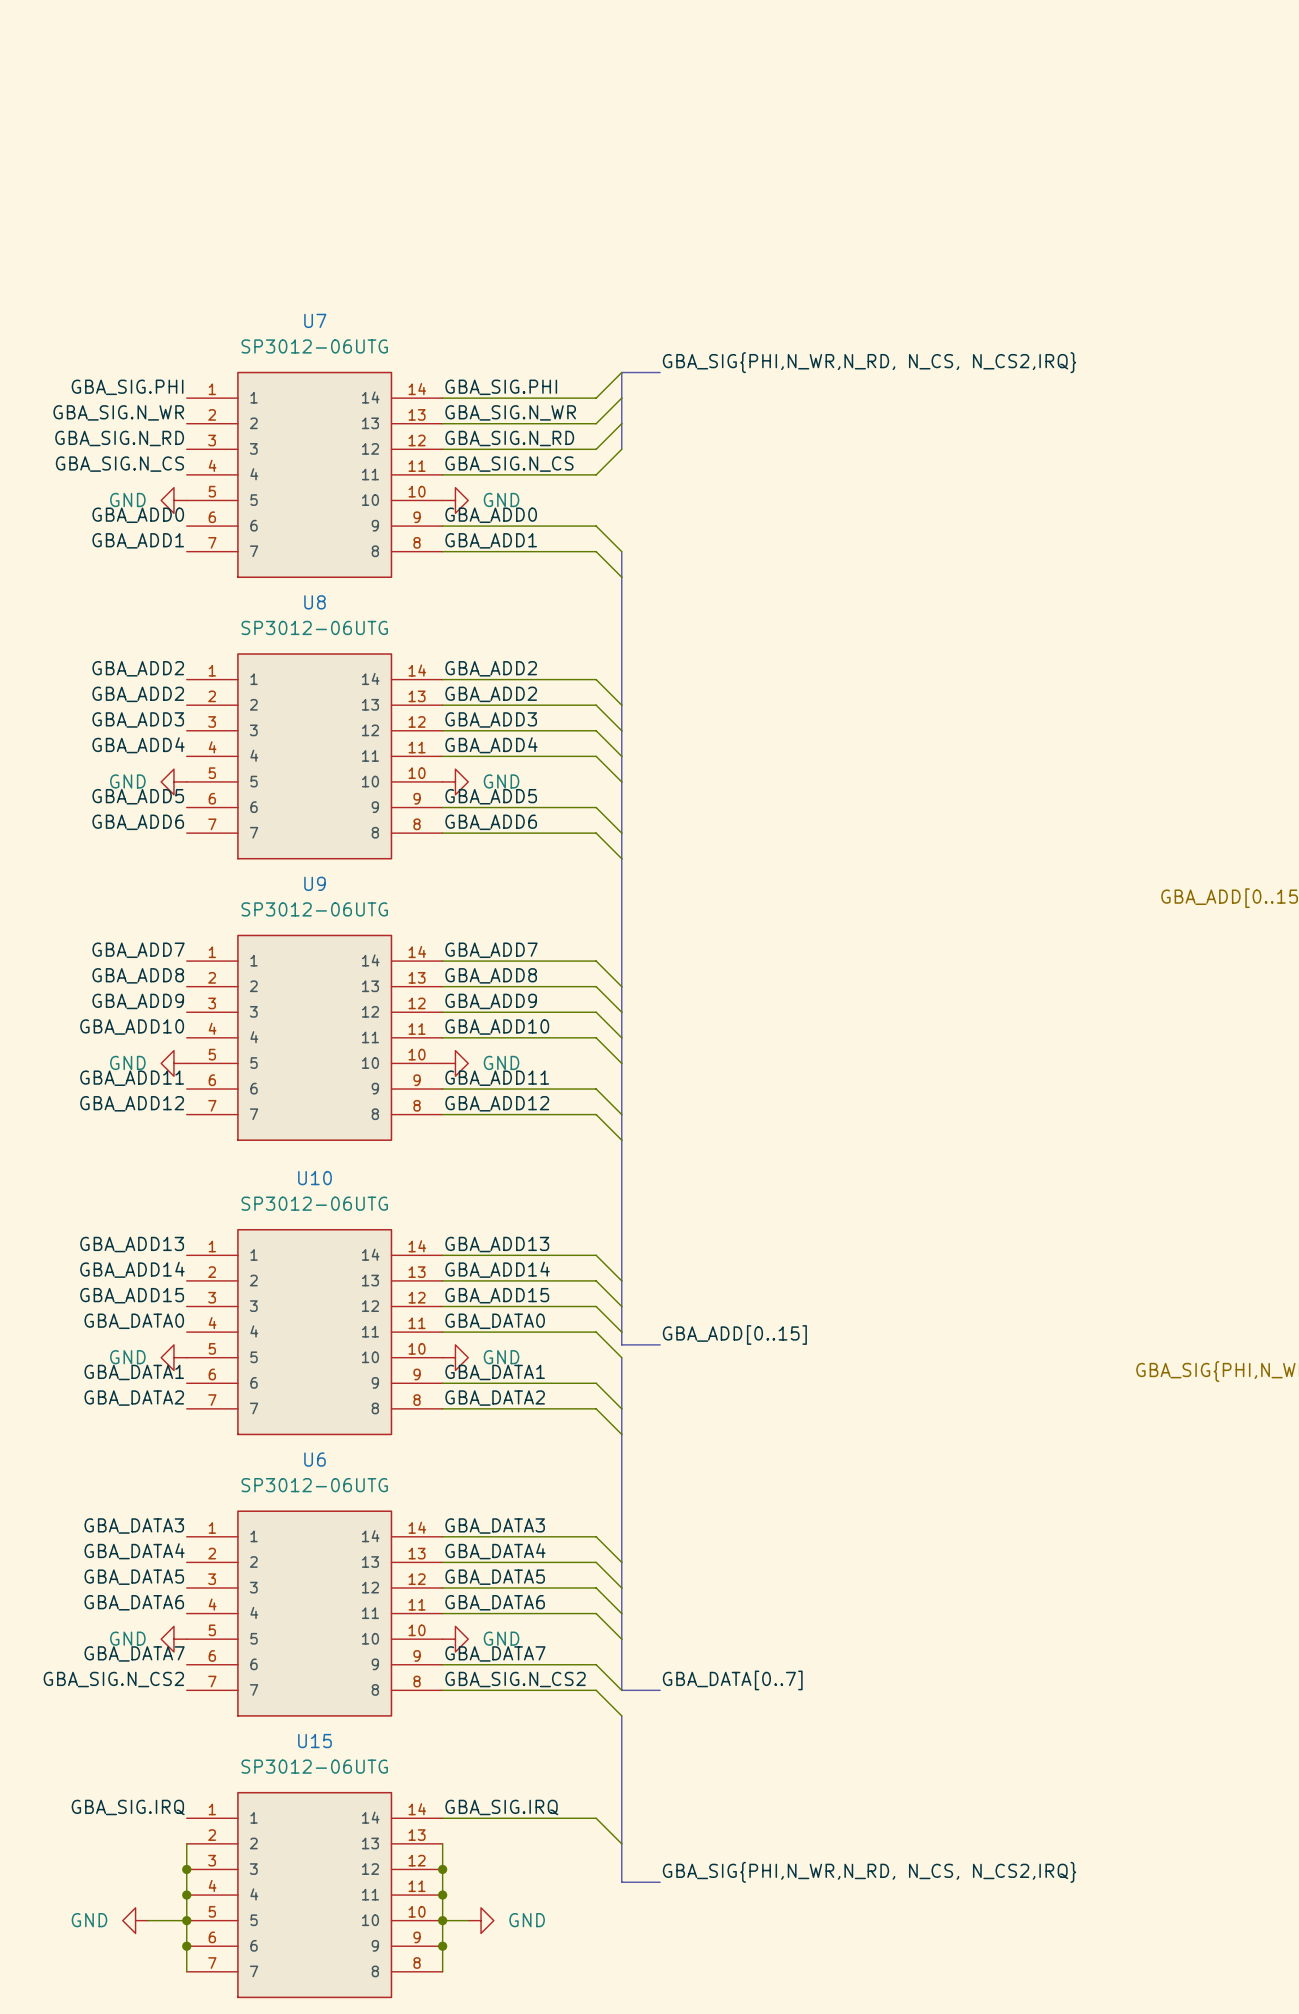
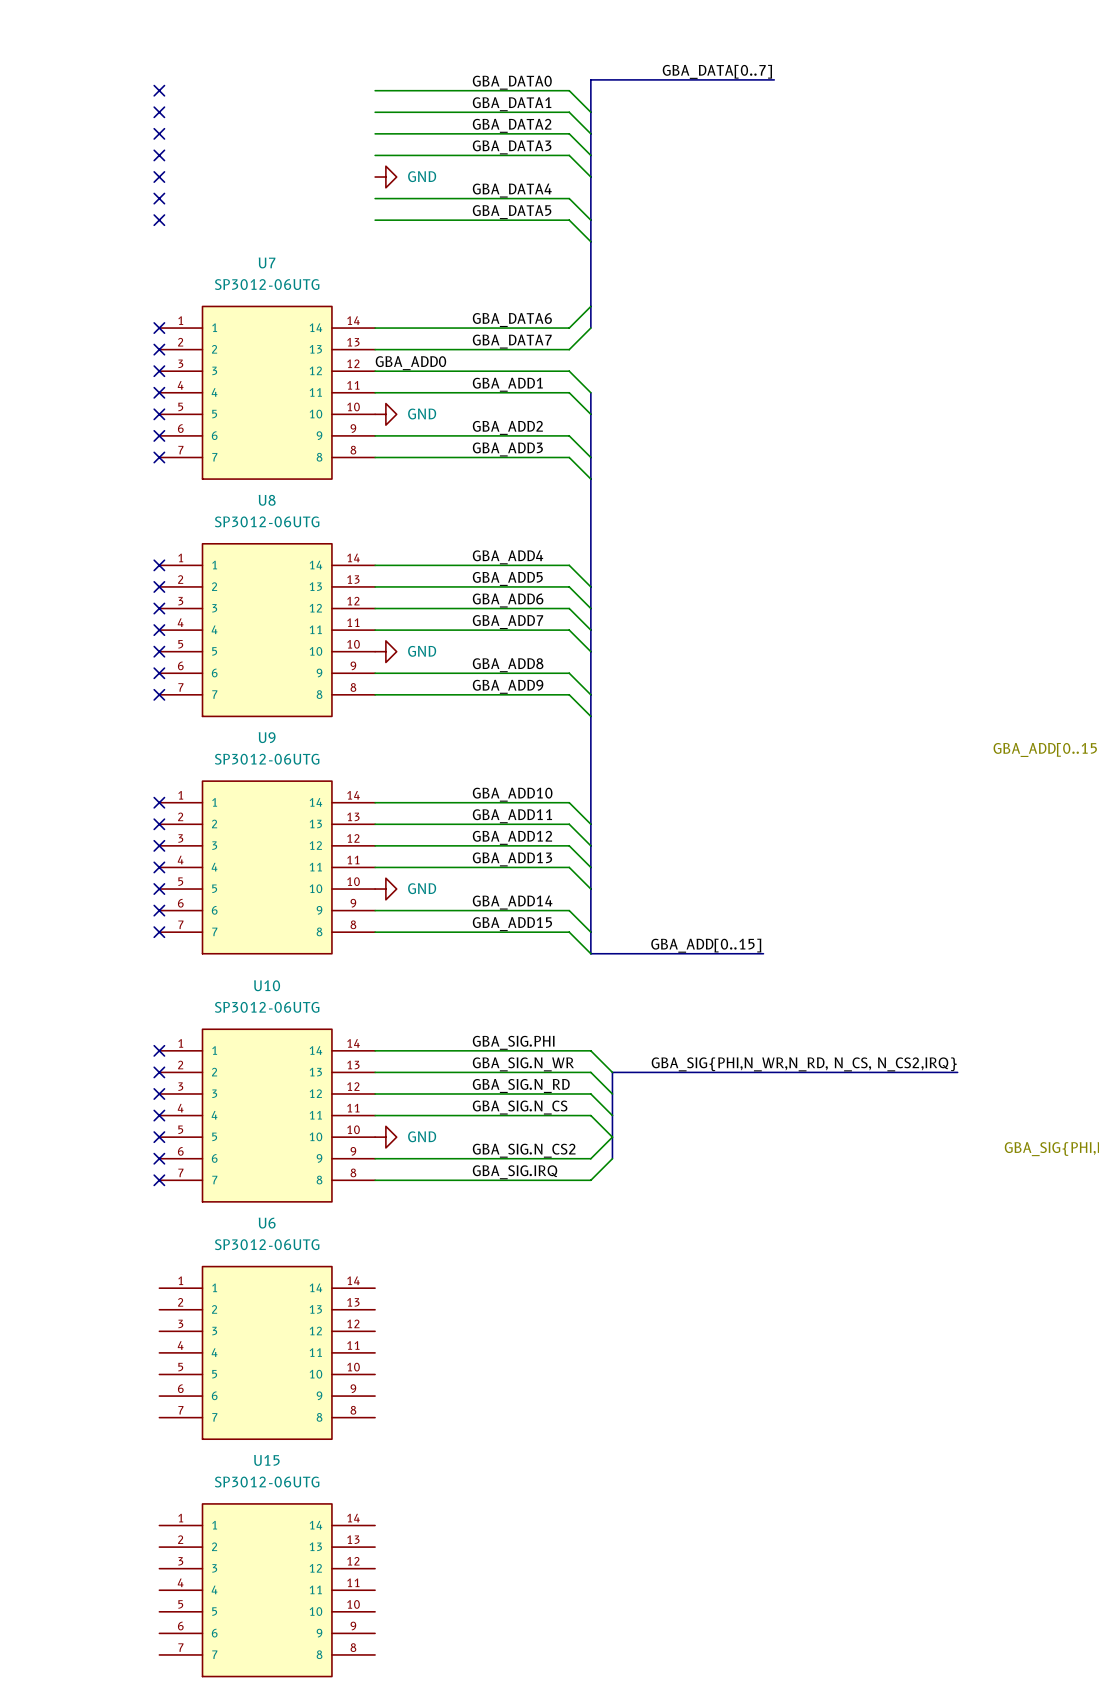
label: none -> GBA_DATA[0..7] (717, 71)
bus: none -> (774, 79) (590, 79) (590, 328)
label: none -> GBA_DATA0 (512, 82)
no-connect mark: none -> (159, 90)
wire: none -> (375, 90) (569, 90) (590, 112)
label: none -> GBA_DATA1 (512, 104)
no-connect mark: none -> (159, 112)
wire: none -> (375, 112) (569, 112) (590, 133)
label: none -> GBA_DATA2 (512, 125)
no-connect mark: none -> (159, 133)
wire: none -> (375, 133) (569, 133) (590, 155)
label: none -> GBA_DATA3 (512, 147)
no-connect mark: none -> (159, 155)
wire: none -> (375, 155) (569, 155) (590, 177)
no-connect mark: none -> (159, 177)
power symbol: none -> GND (385, 177)
label: none -> GBA_DATA4 (512, 190)
no-connect mark: none -> (159, 198)
wire: none -> (375, 198) (569, 198) (590, 220)
label: none -> GBA_DATA5 (512, 212)
no-connect mark: none -> (159, 220)
wire: none -> (375, 220) (569, 220) (590, 241)
label: GBA_SIG{PHI,N_WR,N_RD, N_CS, N_CS2,IRQ} (869, 362) -> none
wire: (621, 372) (596, 398) -> (590, 306) (569, 328) (504, 328)
bus: (660, 372) (621, 372) (621, 449) -> none
label: GBA_SIG.PHI (127, 387) -> none
label: GBA_SIG.PHI (501, 387) -> none
label: none -> GBA_DATA6 (512, 320)
no-connect mark: none -> (159, 328)
wire: (621, 398) (596, 423) -> (590, 328) (569, 349) (504, 349)
label: GBA_SIG.N_WR (118, 412) -> none
label: GBA_SIG.N_WR (510, 412) -> none
label: none -> GBA_DATA7 (512, 341)
no-connect mark: none -> (159, 349)
wire: (621, 423) (596, 449) -> (590, 392) (569, 371) (504, 371)
label: GBA_SIG.N_RD (119, 438) -> none
label: GBA_SIG.N_RD (509, 438) -> GBA_ADD0 (410, 363)
no-connect mark: none -> (159, 371)
wire: (621, 449) (596, 474) -> (590, 414) (569, 392) (504, 392)
label: GBA_SIG.N_CS (119, 464) -> none
label: GBA_SIG.N_CS (509, 464) -> none
no-connect mark: none -> (159, 392)
bus: none -> (590, 392) (590, 953) (763, 953)
power symbol: GND (173, 500) -> none
no-connect mark: none -> (159, 414)
label: GBA_ADD0 (138, 515) -> none
label: GBA_ADD0 (491, 515) -> none
label: none -> GBA_ADD2 (507, 427)
no-connect mark: none -> (159, 435)
wire: (596, 526) (621, 551) -> (504, 435) (569, 435) (590, 457)
label: GBA_ADD1 (138, 540) -> none
label position: GBA_ADD1 (491, 540) -> GBA_ADD1 (507, 384)
label: none -> GBA_ADD3 (507, 449)
no-connect mark: none -> (159, 457)
wire: (596, 551) (621, 577) -> (504, 457) (569, 457) (590, 479)
bus: (621, 551) (621, 1344) (660, 1344) -> none
label: GBA_ADD2 (138, 668) -> none
label: GBA_ADD2 (491, 668) -> none
no-connect mark: none -> (159, 565)
wire: (596, 679) (621, 705) -> (504, 565) (569, 565) (590, 586)
label: GBA_ADD2 (138, 694) -> none
label: GBA_ADD2 (491, 694) -> none
no-connect mark: none -> (159, 586)
wire: (596, 705) (621, 730) -> (504, 586) (569, 586) (590, 608)
label: GBA_ADD3 (138, 719) -> none
label: GBA_ADD3 (491, 719) -> none
no-connect mark: none -> (159, 608)
wire: (596, 730) (621, 756) -> (504, 608) (569, 608) (590, 630)
label: GBA_ADD4 (138, 745) -> none
label position: GBA_ADD4 (491, 745) -> GBA_ADD4 (508, 557)
label: none -> GBA_ADD7 (508, 622)
no-connect mark: none -> (159, 630)
wire: (596, 756) (621, 781) -> (504, 630) (569, 630) (590, 651)
power symbol: GND (173, 781) -> none
no-connect mark: none -> (159, 651)
label: GBA_ADD5 (138, 796) -> none
label position: GBA_ADD5 (491, 796) -> GBA_ADD5 (507, 578)
label: none -> GBA_ADD8 (508, 665)
no-connect mark: none -> (159, 673)
wire: (596, 807) (621, 833) -> (504, 673) (569, 673) (590, 694)
label: GBA_ADD6 (138, 822) -> none
label position: GBA_ADD6 (491, 822) -> GBA_ADD6 (508, 600)
label: none -> GBA_ADD9 (508, 686)
no-connect mark: none -> (159, 694)
wire: (596, 833) (621, 858) -> (504, 694) (569, 694) (590, 716)
label: GBA_ADD7 (138, 950) -> none
label: GBA_ADD7 (491, 950) -> none
no-connect mark: none -> (159, 802)
wire: (596, 961) (621, 986) -> (504, 802) (569, 802) (590, 824)
label: GBA_ADD8 (138, 975) -> none
label: GBA_ADD8 (491, 975) -> none
no-connect mark: none -> (159, 824)
wire: (596, 986) (621, 1012) -> (504, 824) (569, 824) (590, 845)
label: GBA_ADD9 (138, 1001) -> none
label: GBA_ADD9 (491, 1001) -> none
no-connect mark: none -> (159, 845)
wire: (596, 1012) (621, 1037) -> (504, 845) (569, 845) (590, 867)
label: GBA_ADD10 (132, 1027) -> none
label position: GBA_ADD10 (497, 1027) -> GBA_ADD10 (512, 794)
label: none -> GBA_ADD13 (512, 859)
no-connect mark: none -> (159, 867)
wire: (596, 1037) (621, 1063) -> (504, 867) (569, 867) (590, 889)
power symbol: GND (173, 1063) -> none
no-connect mark: none -> (159, 889)
label: none -> GBA_ADD14 (512, 902)
label: GBA_ADD11 (132, 1078) -> none
label position: GBA_ADD11 (497, 1078) -> GBA_ADD11 (512, 816)
no-connect mark: none -> (159, 910)
wire: (596, 1089) (621, 1114) -> (504, 910) (569, 910) (590, 932)
label: GBA_ADD12 (132, 1103) -> none
label position: GBA_ADD12 (497, 1103) -> GBA_ADD12 (512, 837)
label: none -> GBA_ADD15 (512, 924)
no-connect mark: none -> (159, 932)
wire: (596, 1114) (621, 1140) -> (504, 932) (569, 932) (590, 953)
label: none -> GBA_ADD[0..15] (706, 945)
label: GBA_ADD13 (132, 1244) -> none
label: GBA_ADD13 (497, 1244) -> none
label: none -> GBA_SIG.PHI (513, 1042)
no-connect mark: none -> (159, 1050)
wire: (596, 1255) (621, 1280) -> (504, 1050) (590, 1050) (612, 1072)
label: GBA_ADD14 (132, 1269) -> none
label: GBA_ADD14 (497, 1269) -> none
label: none -> GBA_SIG.N_WR (523, 1064)
label: none -> GBA_SIG{PHI,N_WR,N_RD, N_CS, N_CS2,IRQ} (804, 1064)
no-connect mark: none -> (159, 1072)
wire: (596, 1280) (621, 1306) -> (504, 1072) (590, 1072) (612, 1093)
bus: none -> (957, 1072) (612, 1072) (612, 1158)
label: GBA_ADD15 (132, 1295) -> none
label: GBA_ADD15 (497, 1295) -> none
label: none -> GBA_SIG.N_RD (521, 1085)
no-connect mark: none -> (159, 1093)
wire: (596, 1306) (621, 1332) -> (504, 1093) (590, 1093) (612, 1115)
label: GBA_DATA0 (134, 1321) -> none
label: GBA_DATA0 (495, 1321) -> none
label: none -> GBA_SIG.N_CS (520, 1107)
no-connect mark: none -> (159, 1115)
wire: (596, 1332) (621, 1357) -> (504, 1115) (590, 1115) (612, 1137) (590, 1158) (504, 1158)
label: GBA_ADD[0..15] (734, 1335) -> none
power symbol: GND (173, 1357) -> none
no-connect mark: none -> (159, 1137)
bus: (621, 1357) (621, 1690) (660, 1690) -> none
label: GBA_DATA1 (134, 1372) -> none
label: GBA_DATA1 (495, 1372) -> none
label: none -> GBA_SIG.N_CS2 (524, 1150)
no-connect mark: none -> (159, 1158)
wire: (596, 1383) (621, 1408) -> none
label: GBA_DATA2 (134, 1398) -> none
label: GBA_DATA2 (495, 1398) -> none
label: none -> GBA_SIG.IRQ (515, 1172)
no-connect mark: none -> (159, 1180)
wire: (596, 1408) (621, 1434) -> (504, 1180) (590, 1180) (612, 1158)
label: GBA_DATA3 (134, 1526) -> none
label: GBA_DATA3 (495, 1526) -> none
wire: (442, 1536) (596, 1536) (621, 1562) -> none
label: GBA_DATA4 (134, 1551) -> none
label: GBA_DATA4 (495, 1551) -> none
wire: (442, 1562) (596, 1562) (621, 1587) -> none
label: GBA_DATA5 (134, 1577) -> none
label: GBA_DATA5 (495, 1577) -> none
wire: (442, 1587) (596, 1587) (621, 1613) -> none
label: GBA_DATA6 (134, 1602) -> none
label: GBA_DATA6 (495, 1602) -> none
wire: (442, 1613) (596, 1613) (621, 1639) -> none
power symbol: GND (173, 1639) -> none
power symbol: GND (455, 1639) -> none
label: GBA_DATA7 (134, 1653) -> none
label: GBA_DATA7 (495, 1653) -> none
wire: (442, 1664) (596, 1664) (621, 1690) -> none
label: GBA_SIG.N_CS2 (113, 1679) -> none
label: GBA_SIG.N_CS2 (515, 1679) -> none
label: GBA_DATA[0..7] (732, 1680) -> none
wire: (442, 1690) (596, 1690) (621, 1715) -> none
bus: (621, 1715) (621, 1882) (660, 1882) -> none
label: GBA_SIG.IRQ (128, 1807) -> none
label: GBA_SIG.IRQ (501, 1807) -> none
wire: (442, 1818) (596, 1818) (621, 1843) -> none
wire: (186, 1843) (186, 1971) -> none
wire: (442, 1843) (442, 1971) -> none
junction: (186, 1869) -> none
junction: (442, 1869) -> none
label: GBA_SIG{PHI,N_WR,N_RD, N_CS, N_CS2,IRQ} (869, 1872) -> none
junction: (186, 1895) -> none
junction: (442, 1895) -> none
power symbol: GND (135, 1920) -> none
wire: (148, 1920) (186, 1920) -> none
junction: (186, 1920) -> none
wire: (442, 1920) (468, 1920) -> none
junction: (442, 1920) -> none
power symbol: GND (481, 1920) -> none
junction: (186, 1946) -> none
junction: (442, 1946) -> none

